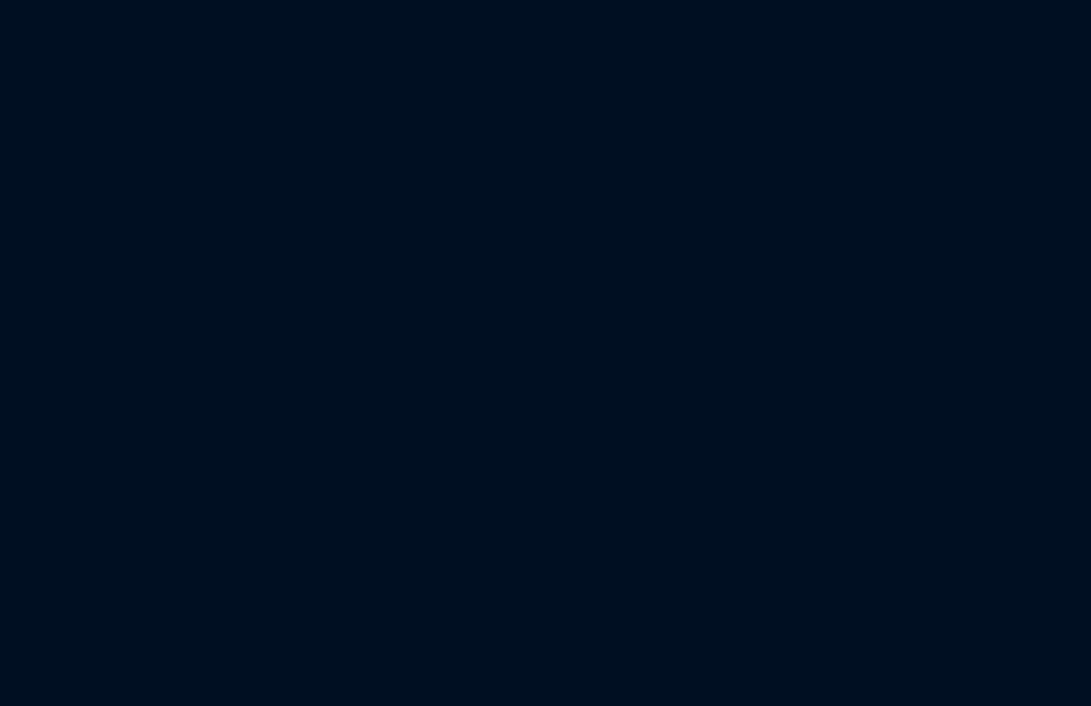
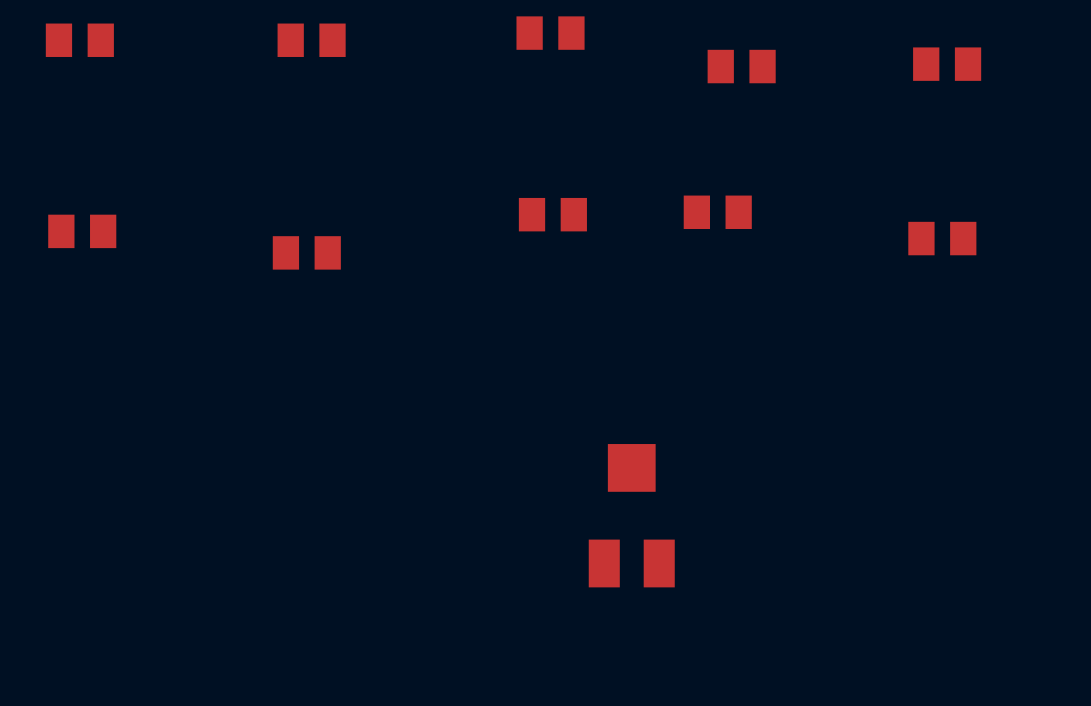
part: none -> (550, 33)
part: none -> (79, 40)
part: none -> (311, 40)
part: none -> (947, 64)
part: none -> (741, 66)
part: none -> (717, 212)
part: none -> (552, 214)
part: none -> (82, 231)
part: none -> (942, 238)
part: none -> (306, 252)
part: none -> (631, 515)

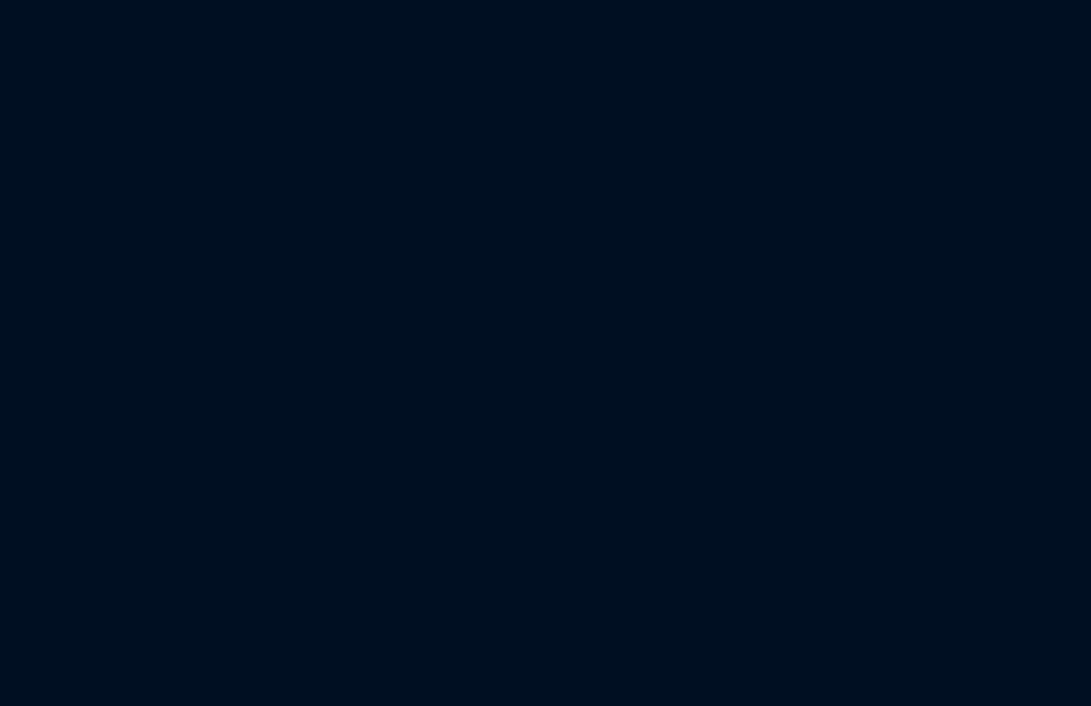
part: (550, 33) -> none
part: (79, 40) -> none
part: (311, 40) -> none
part: (947, 64) -> none
part: (741, 66) -> none
part: (717, 212) -> none
part: (552, 214) -> none
part: (82, 231) -> none
part: (942, 238) -> none
part: (306, 252) -> none
part: (631, 515) -> none

